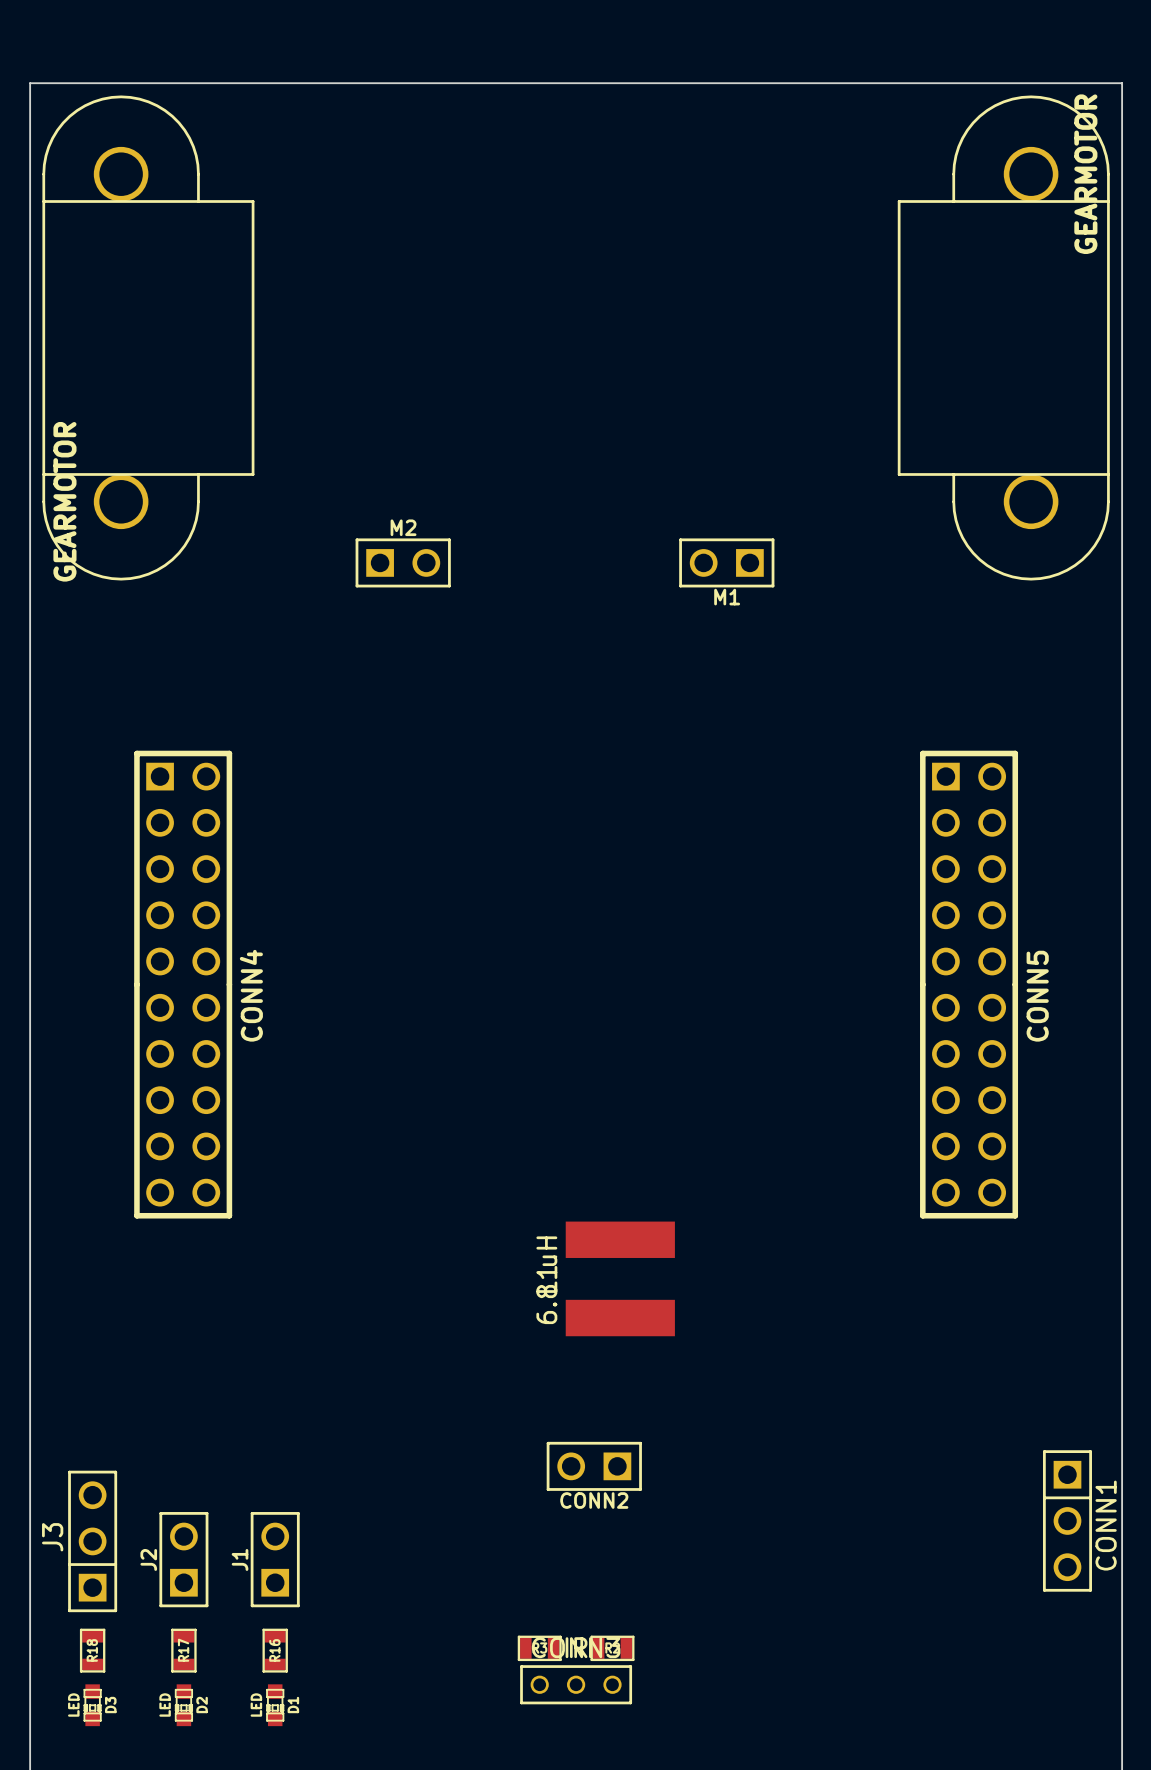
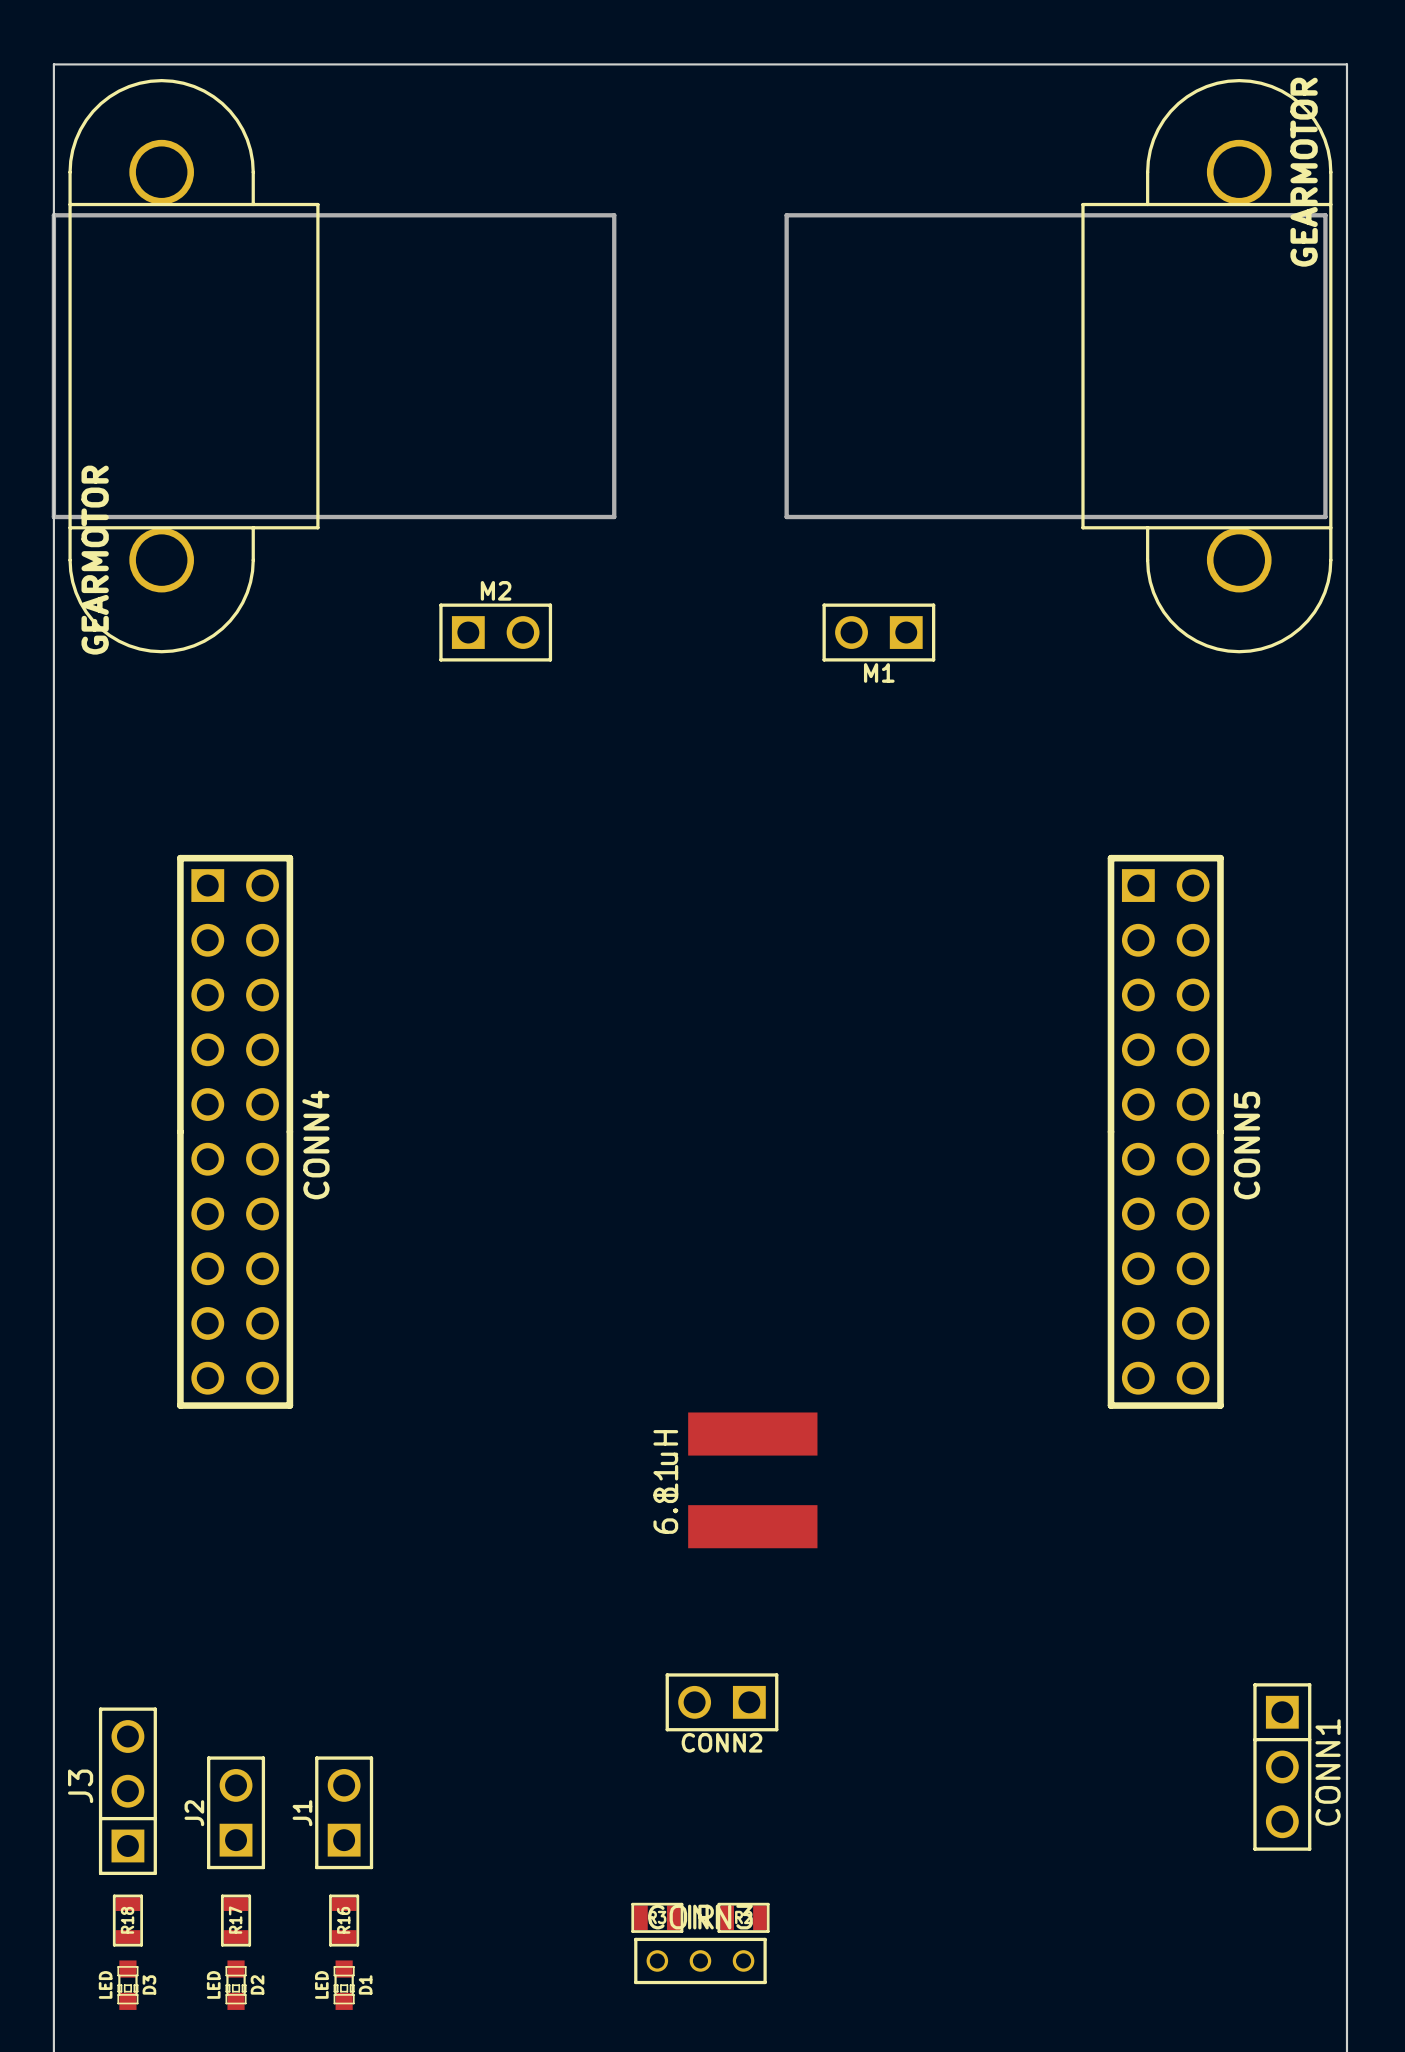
line: none -> (53, 215) (614, 215) (614, 517) (53, 517) (53, 215)
line: none -> (786, 215) (1325, 215) (1325, 517) (786, 517) (786, 215)

